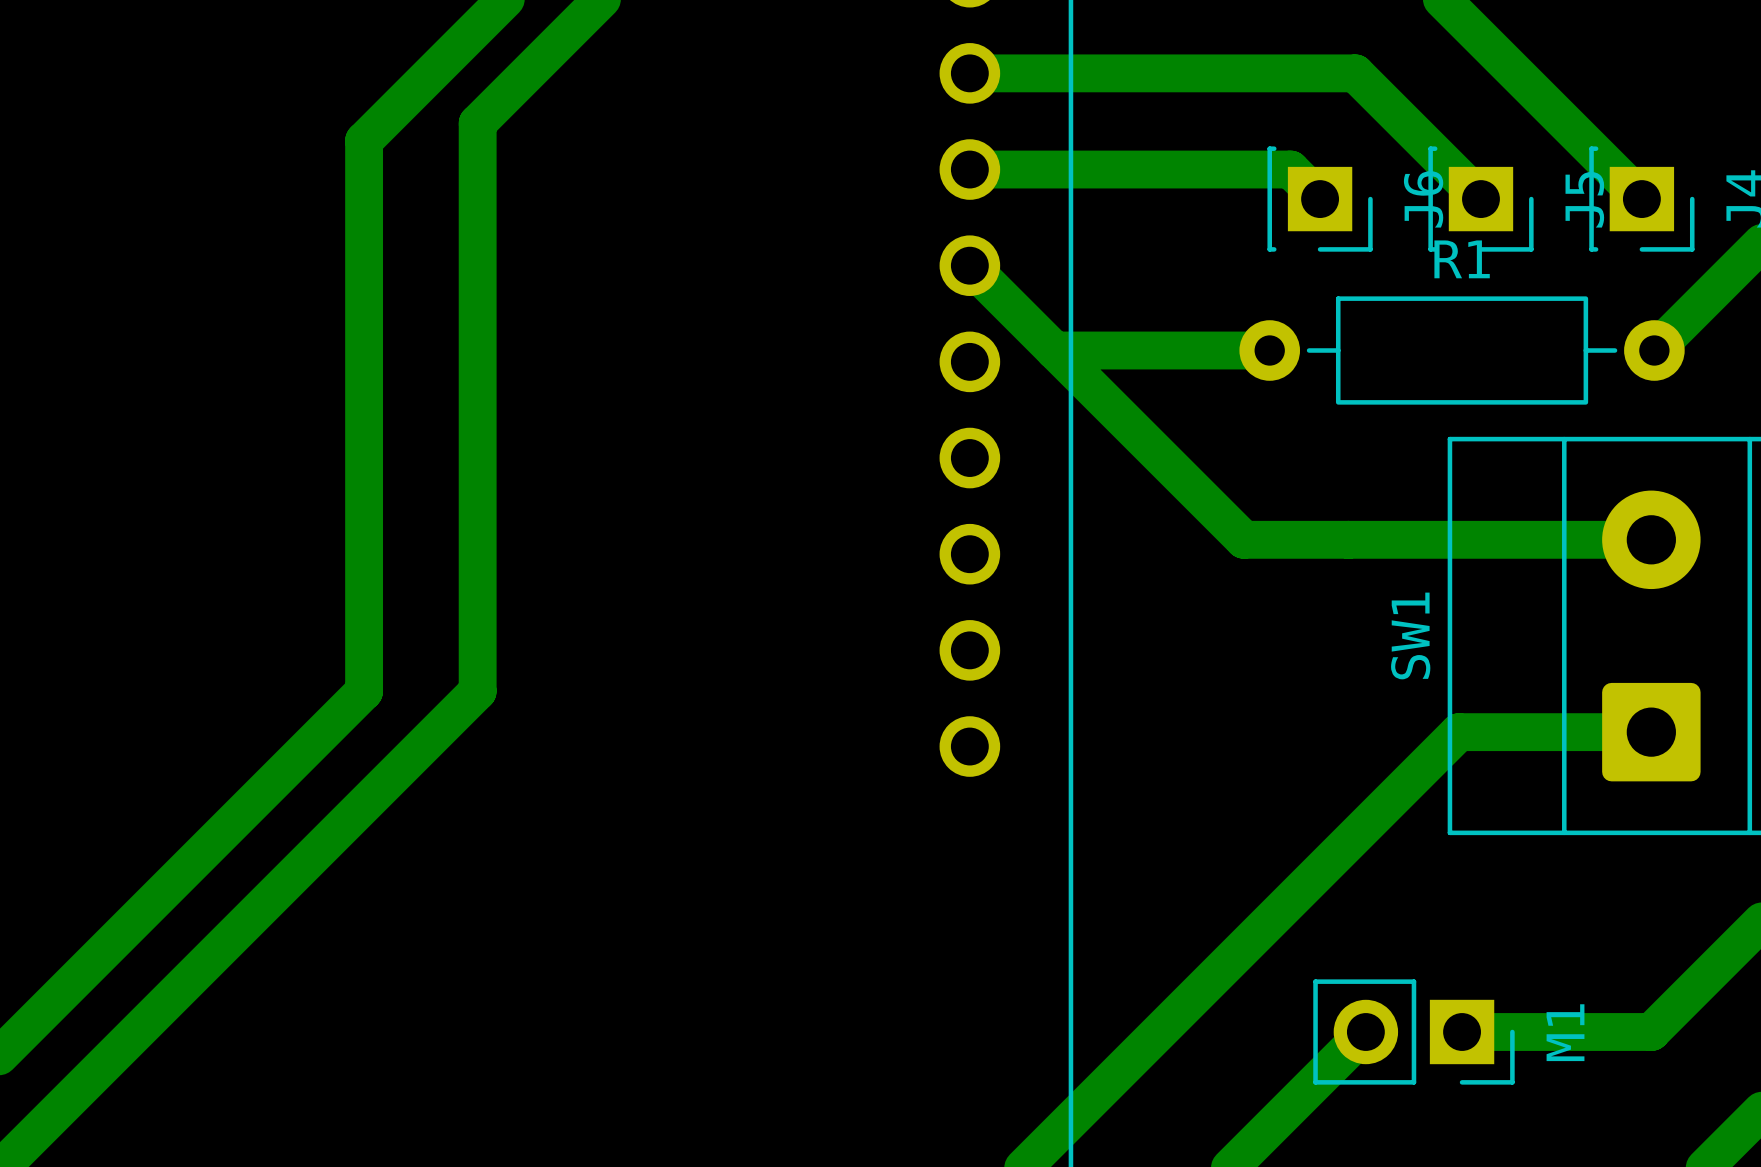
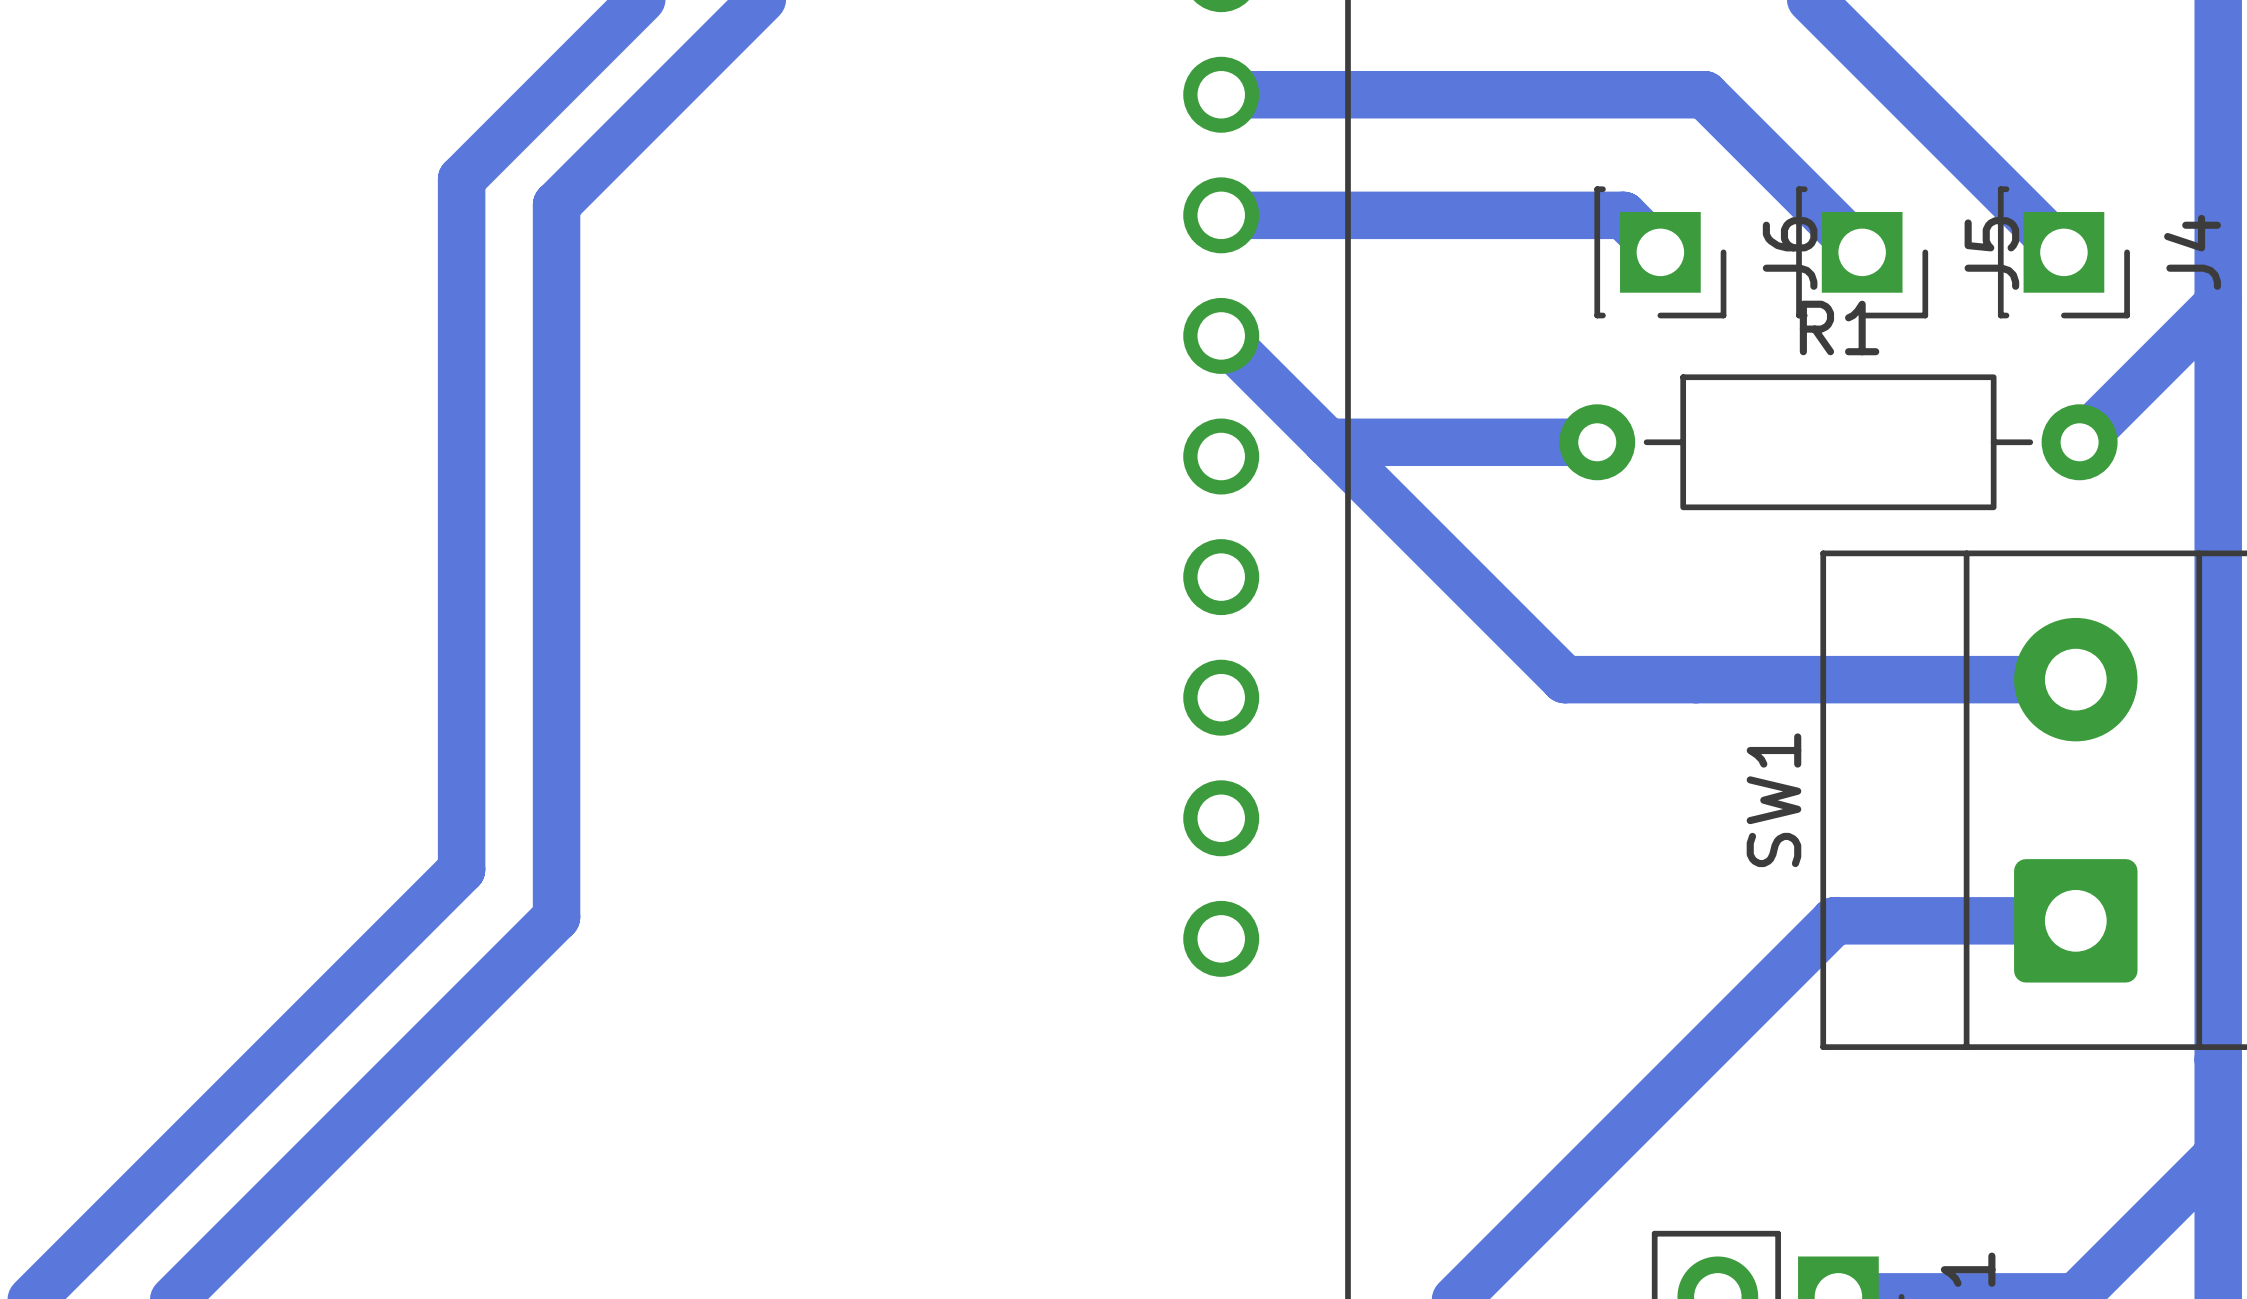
bottom track: (477, 123) (477, 691) (439, 729) -> (604, 157) (556, 204) (556, 917)

